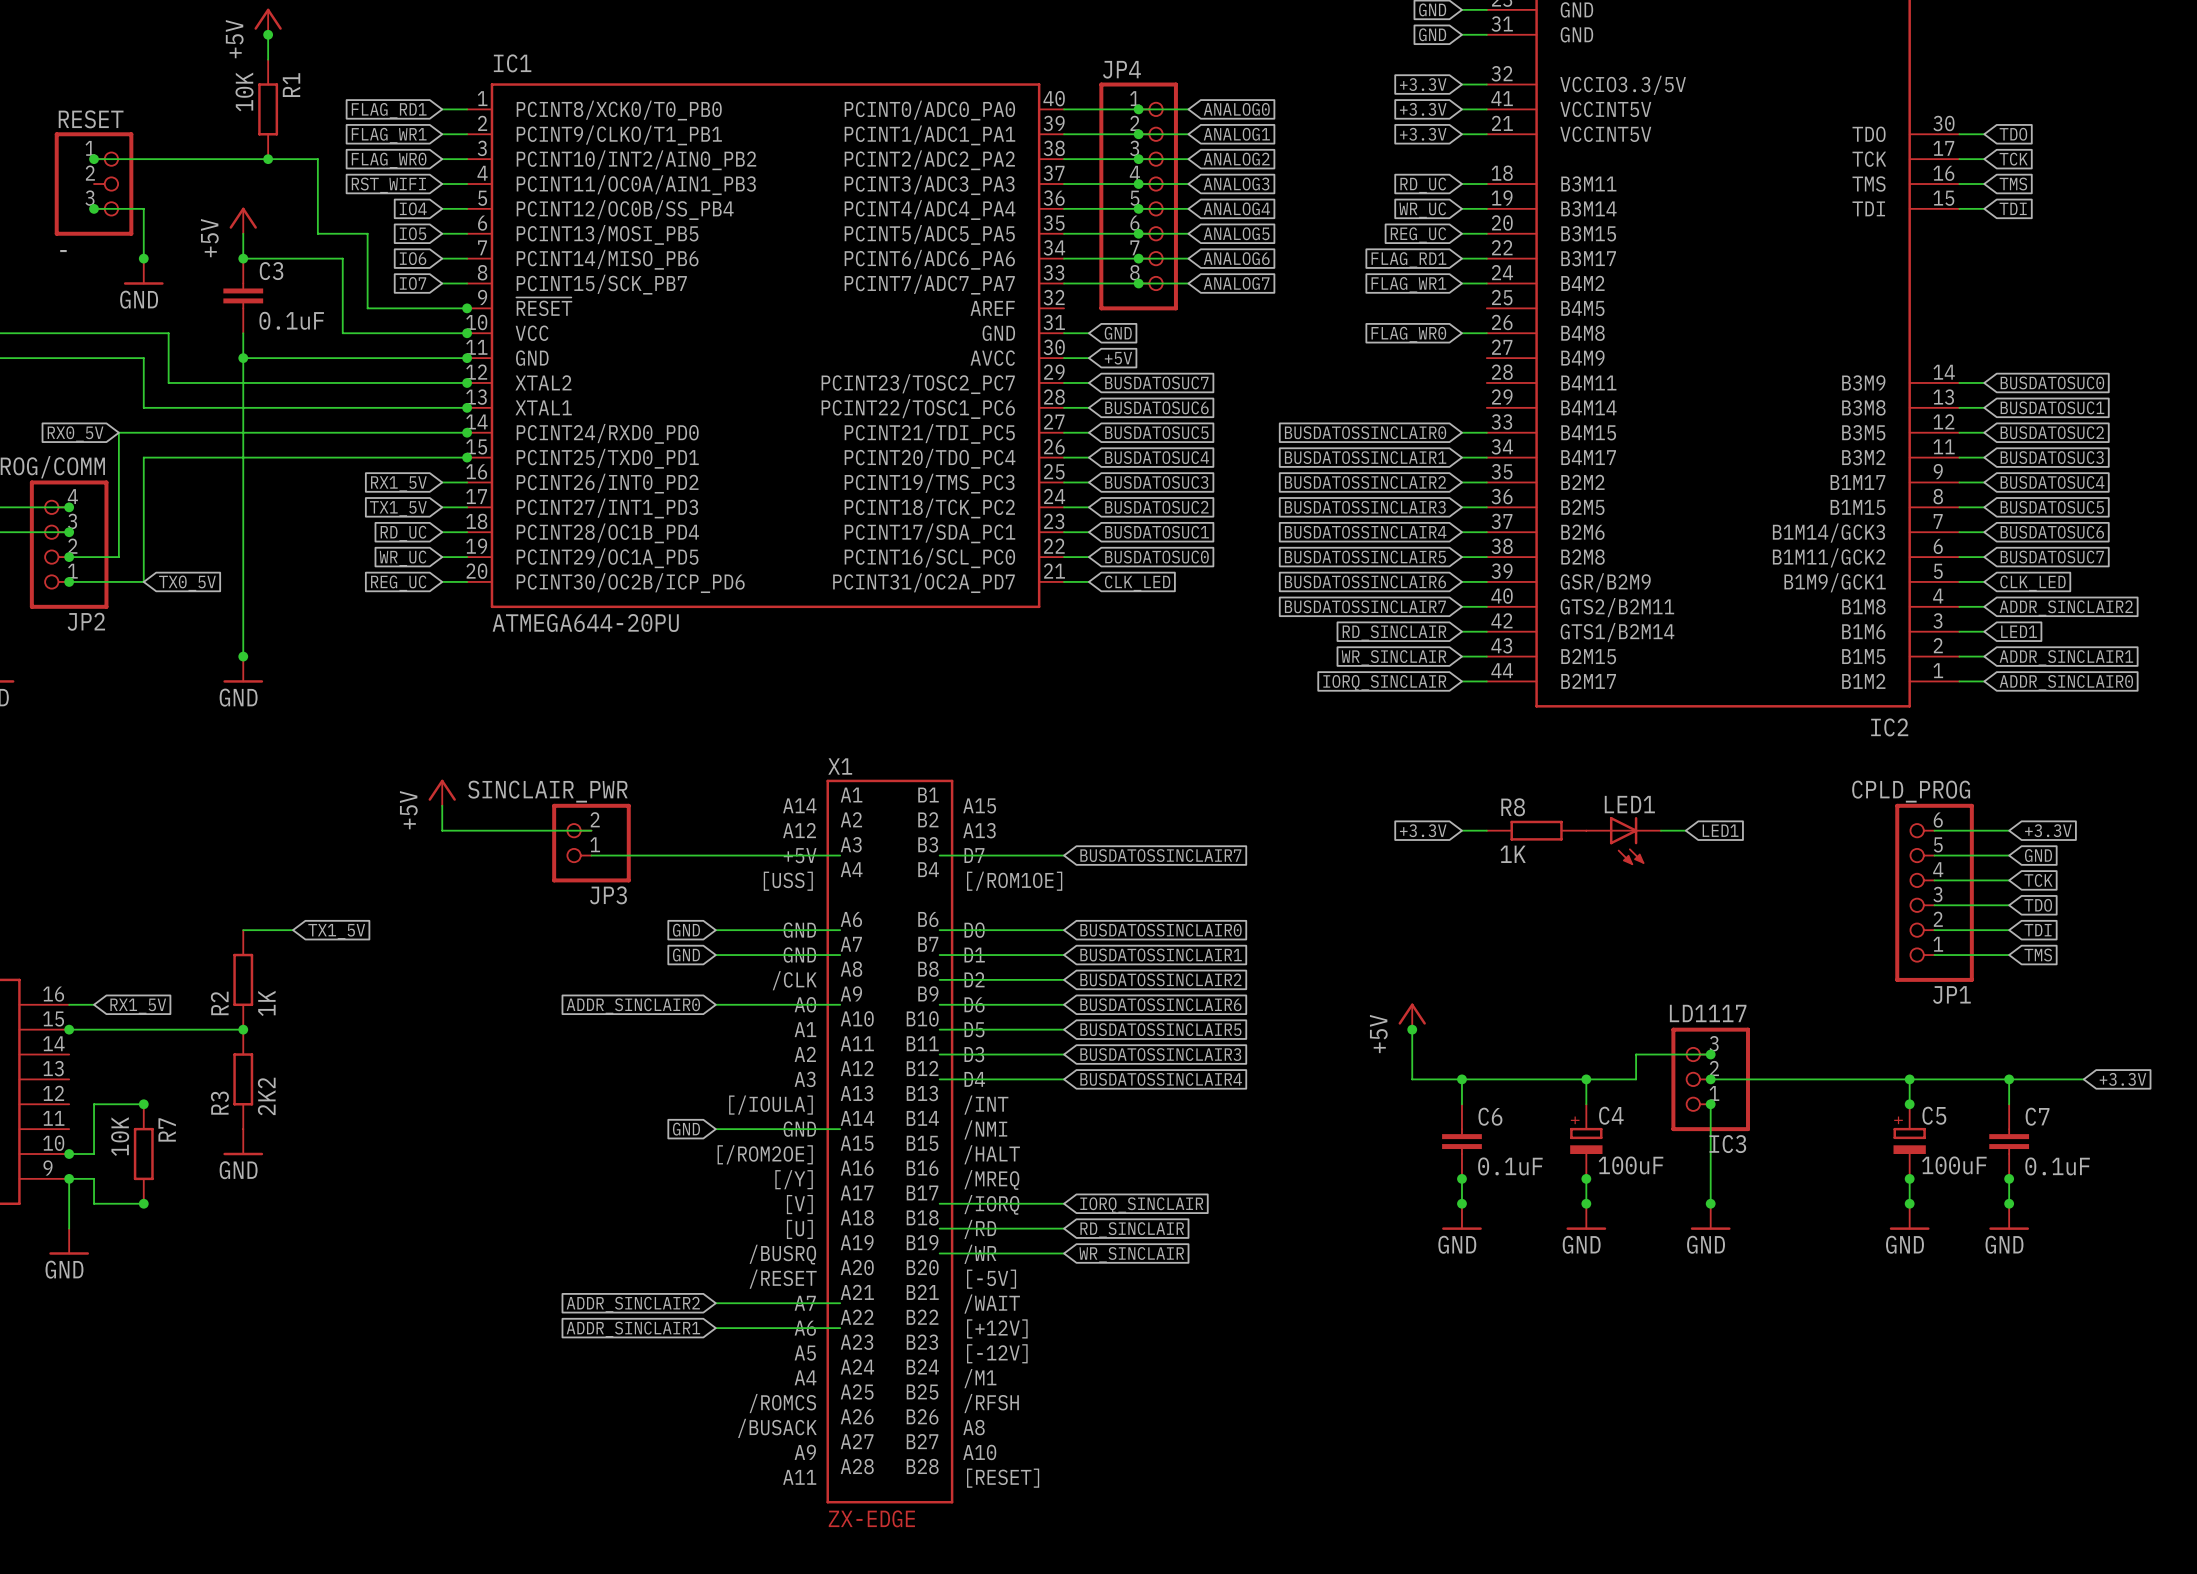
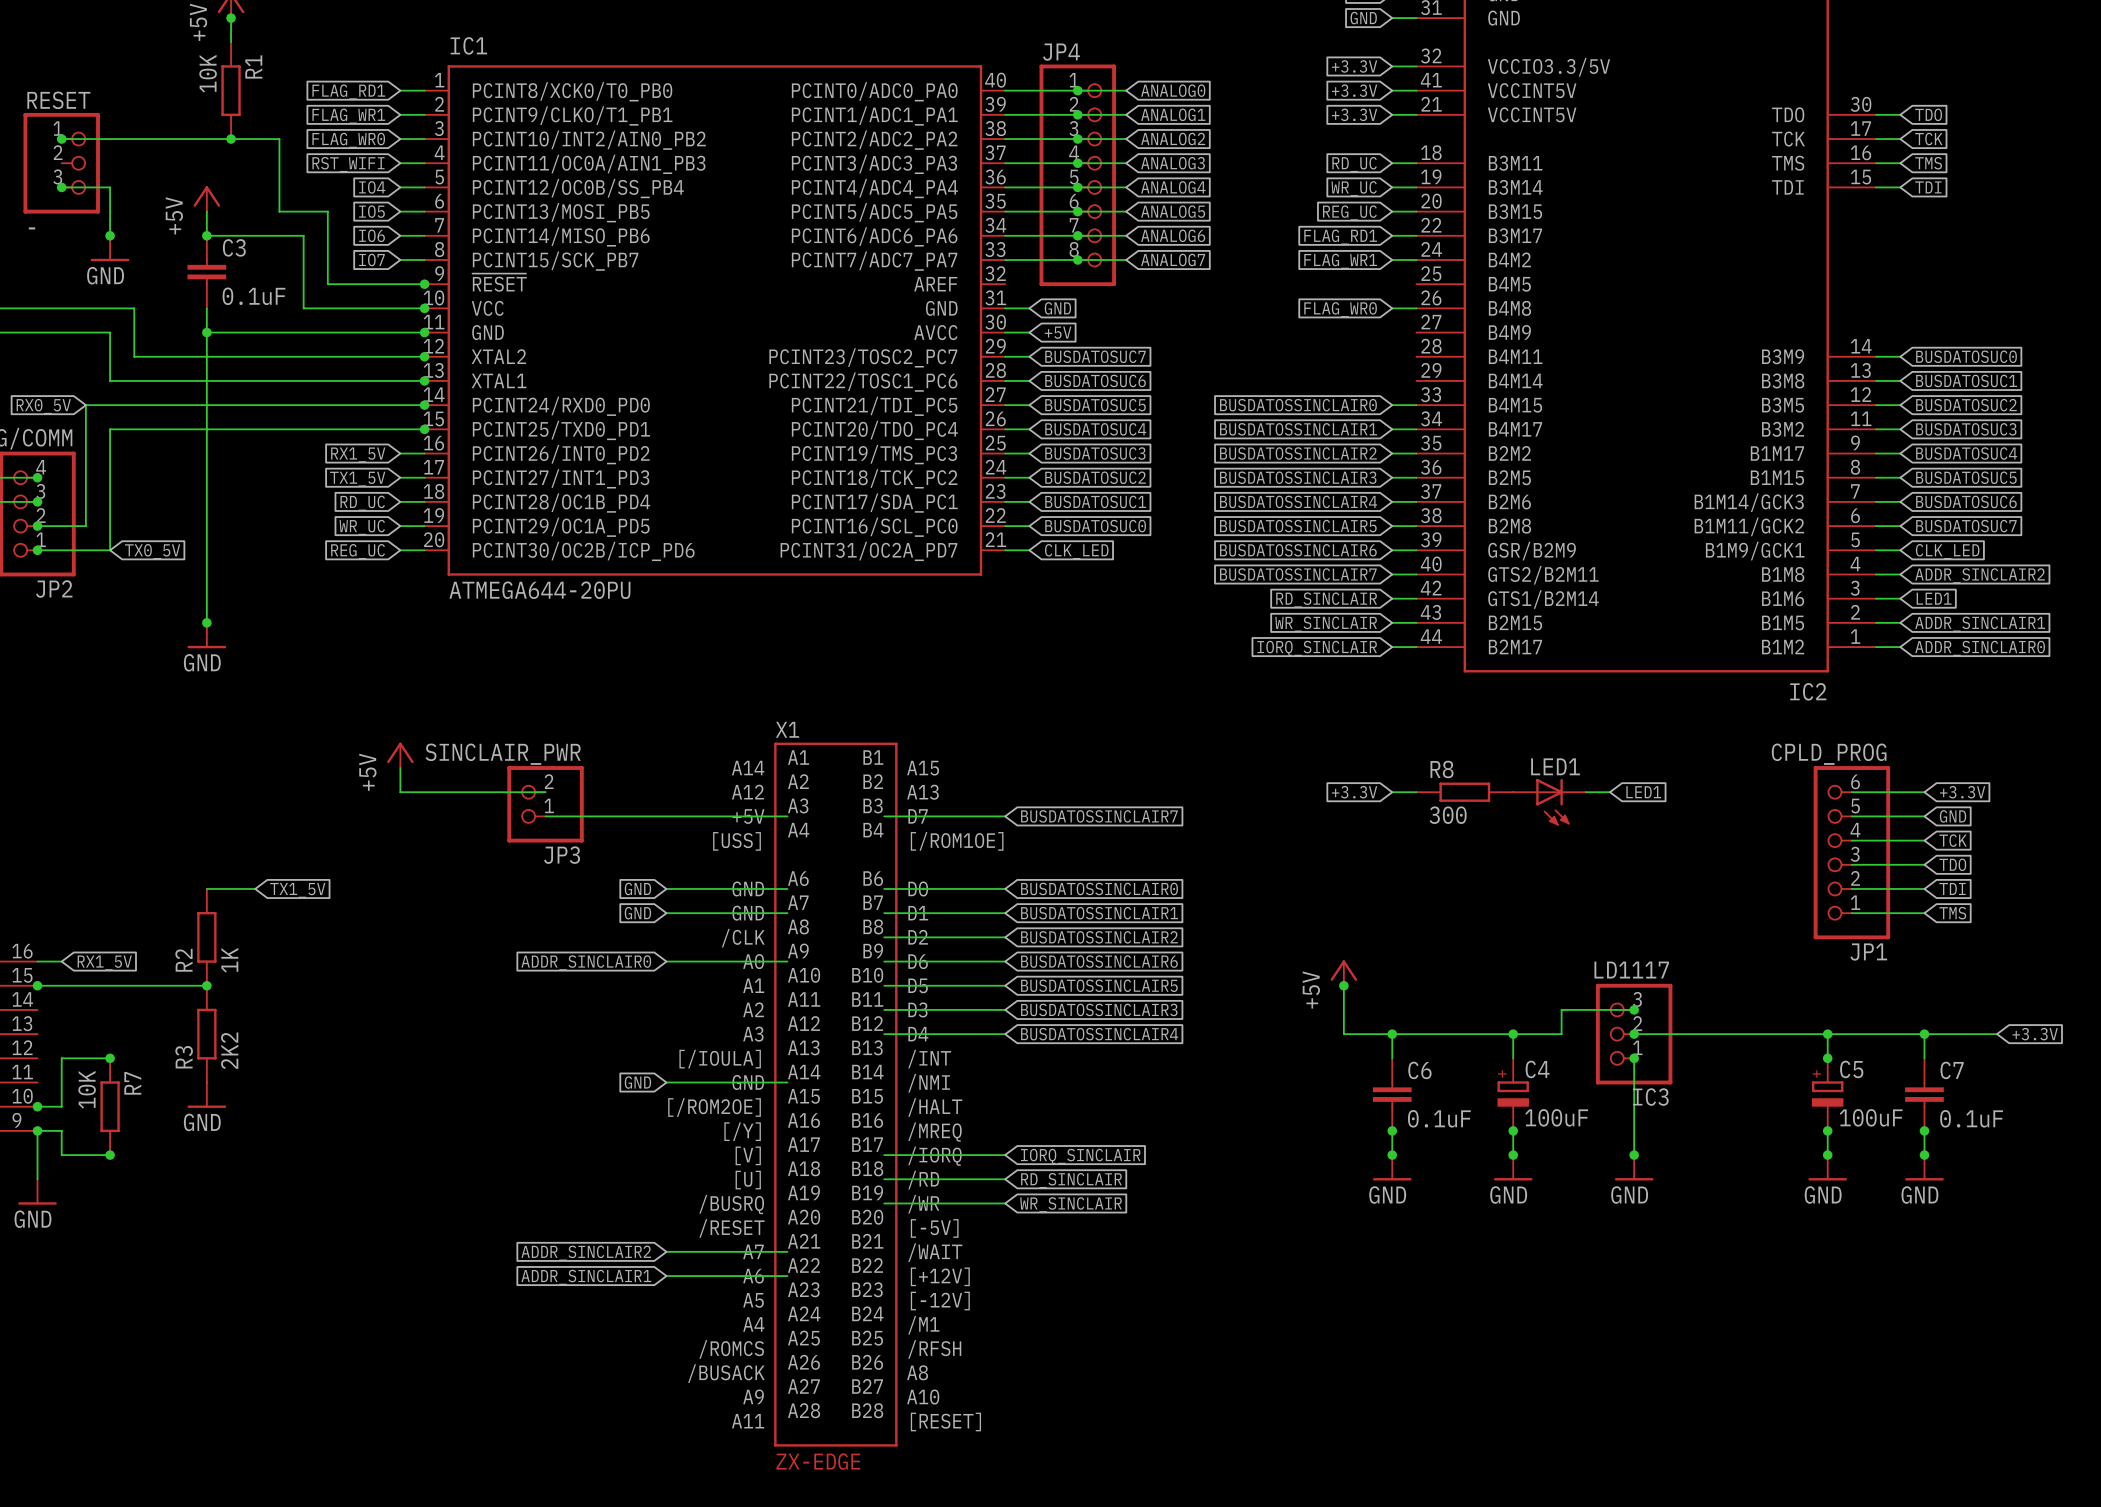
R8 value: 1K (1513, 854) -> 300 (1448, 815)

